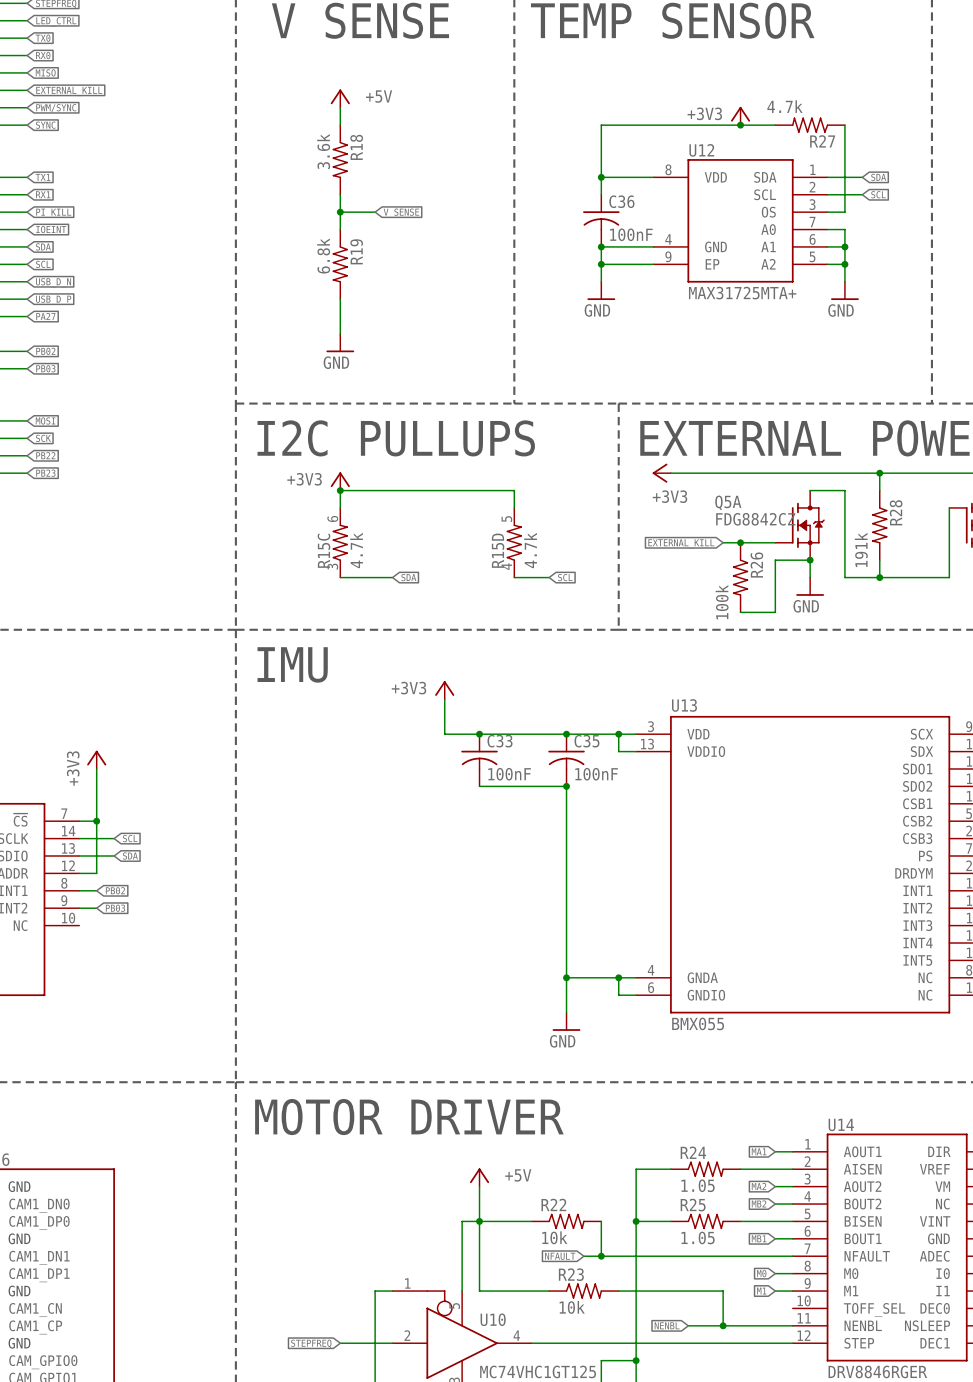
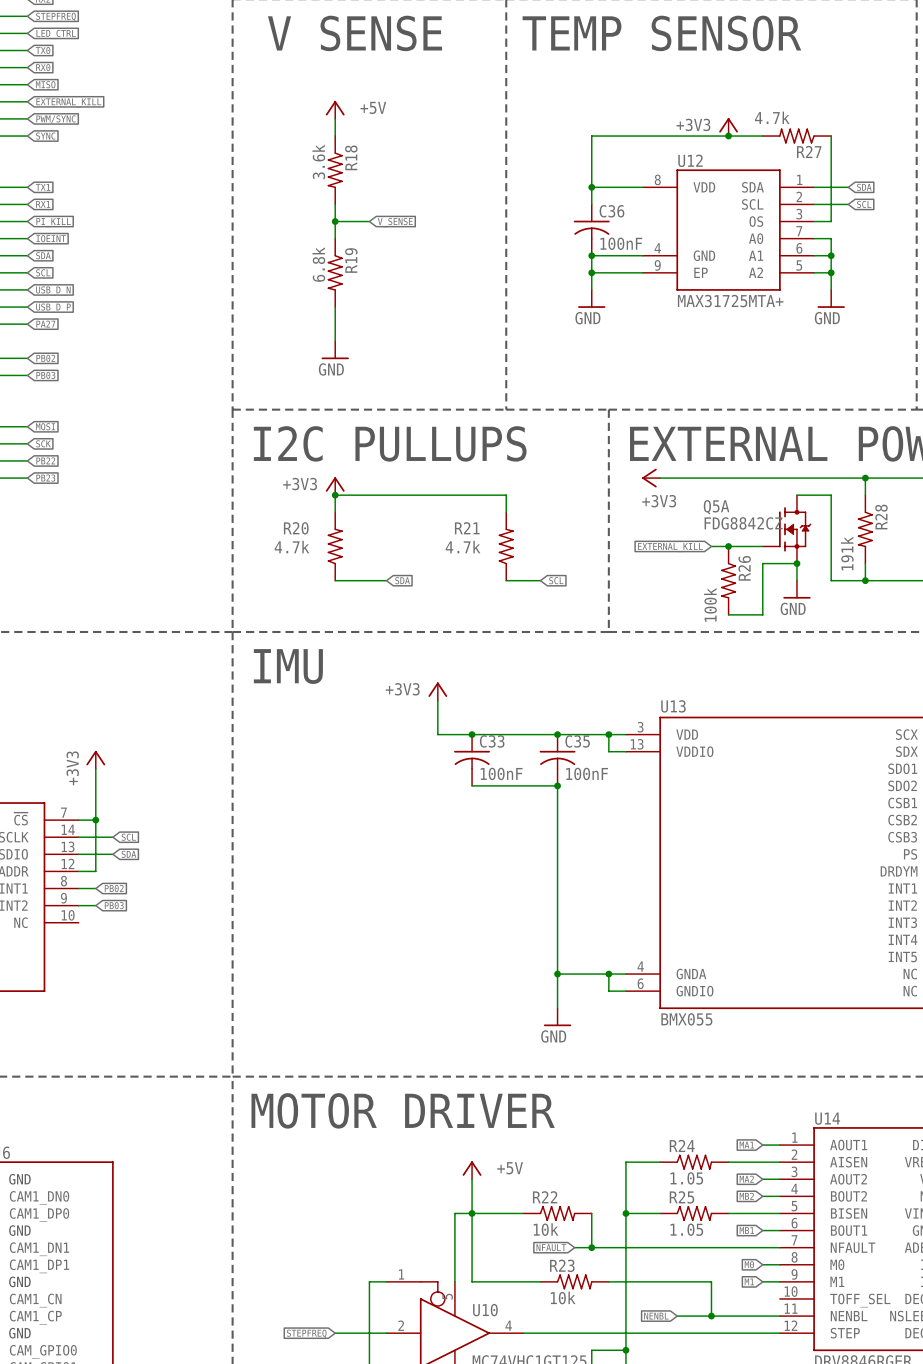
R15C: 4.7k (340, 542) -> none
R20: none -> 4.7k (335, 546)
R15D: 4.7k (514, 542) -> none
R21: none -> 4.7k (506, 546)

